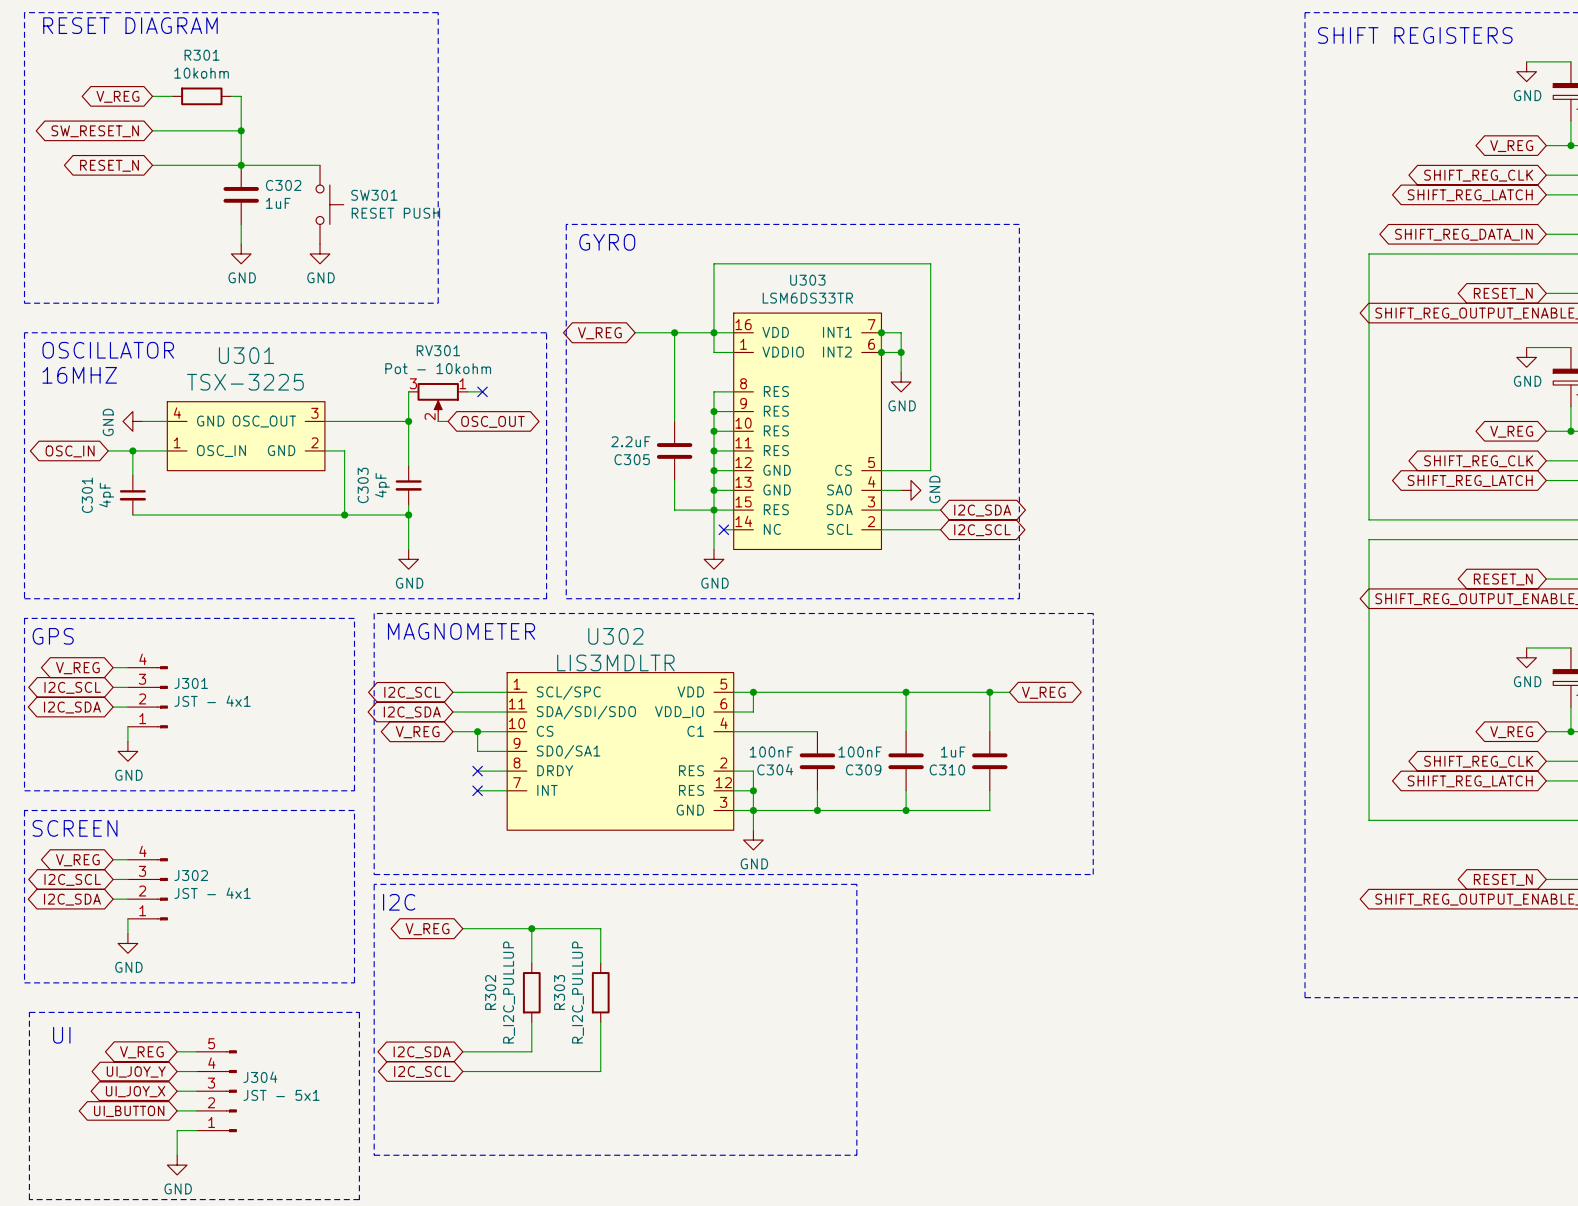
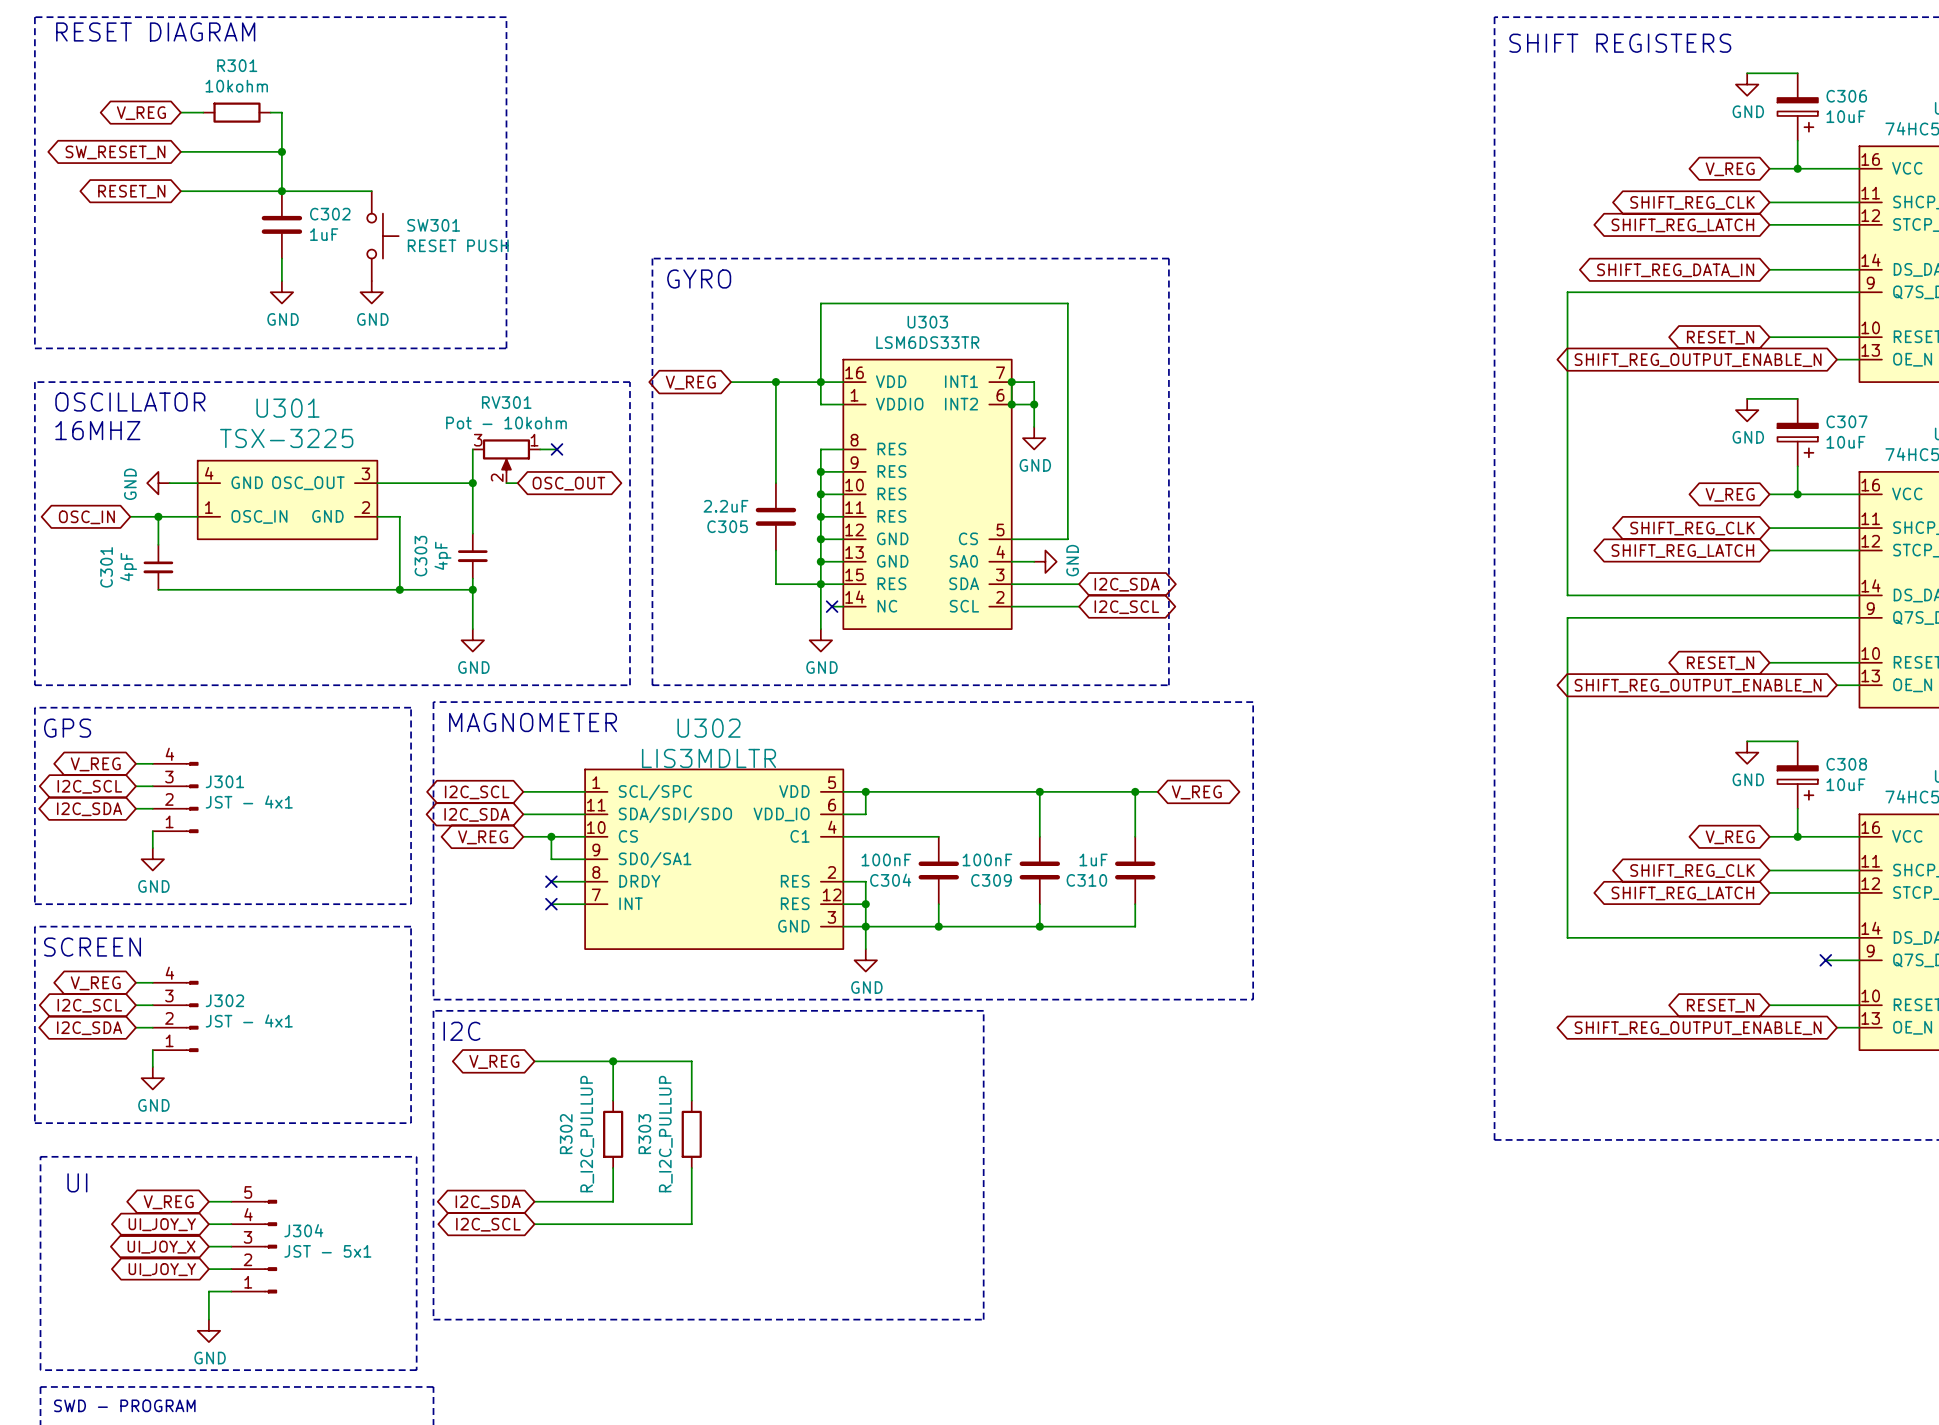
global label: UI_BUTTON (129, 1111) -> UI_JOY_Y (162, 1269)

